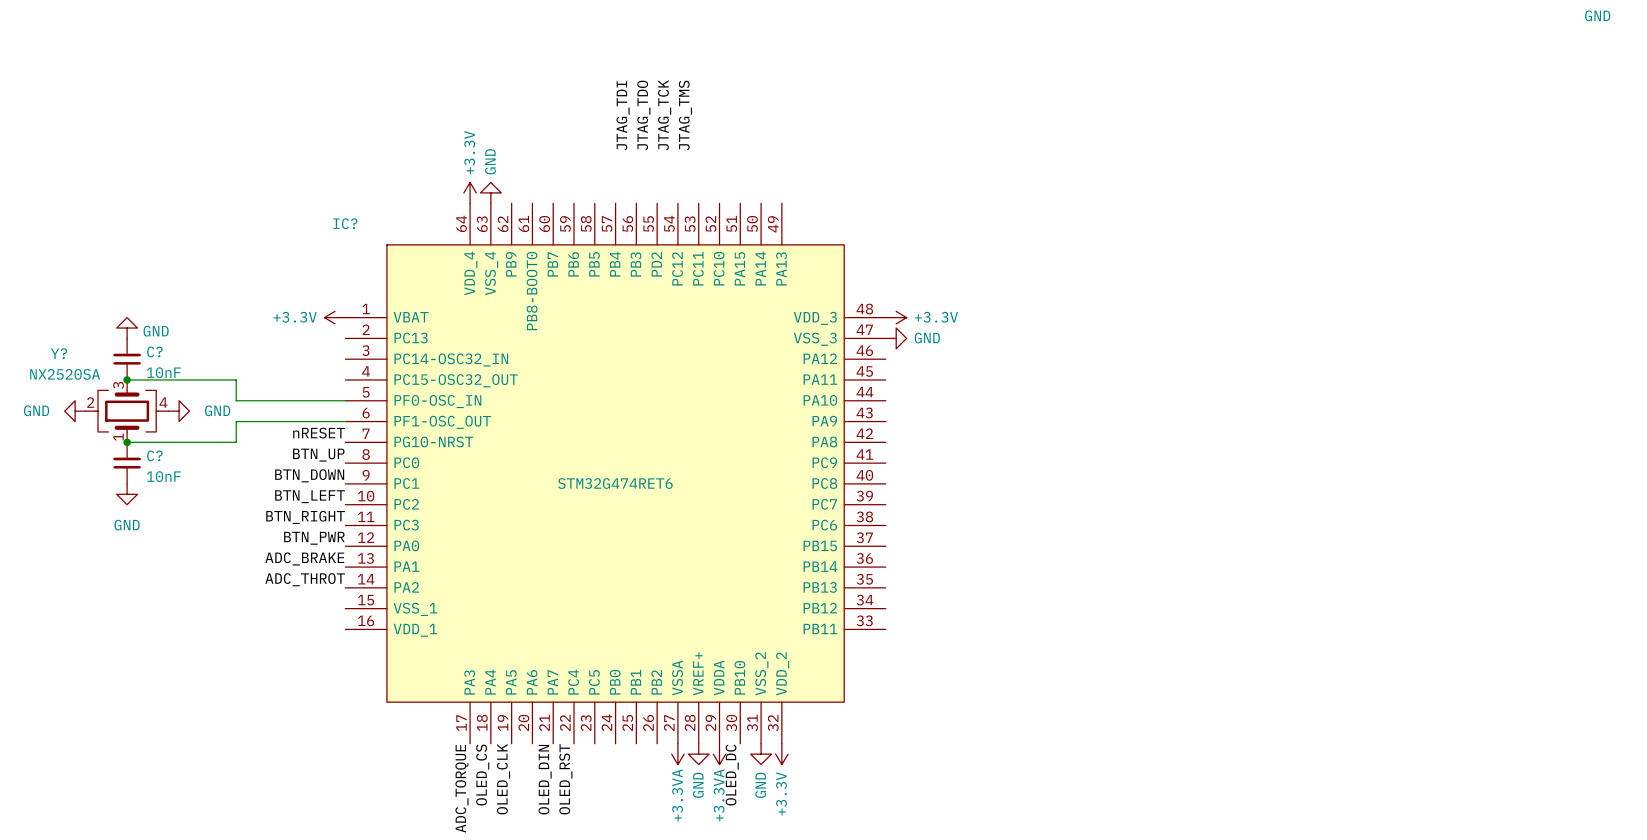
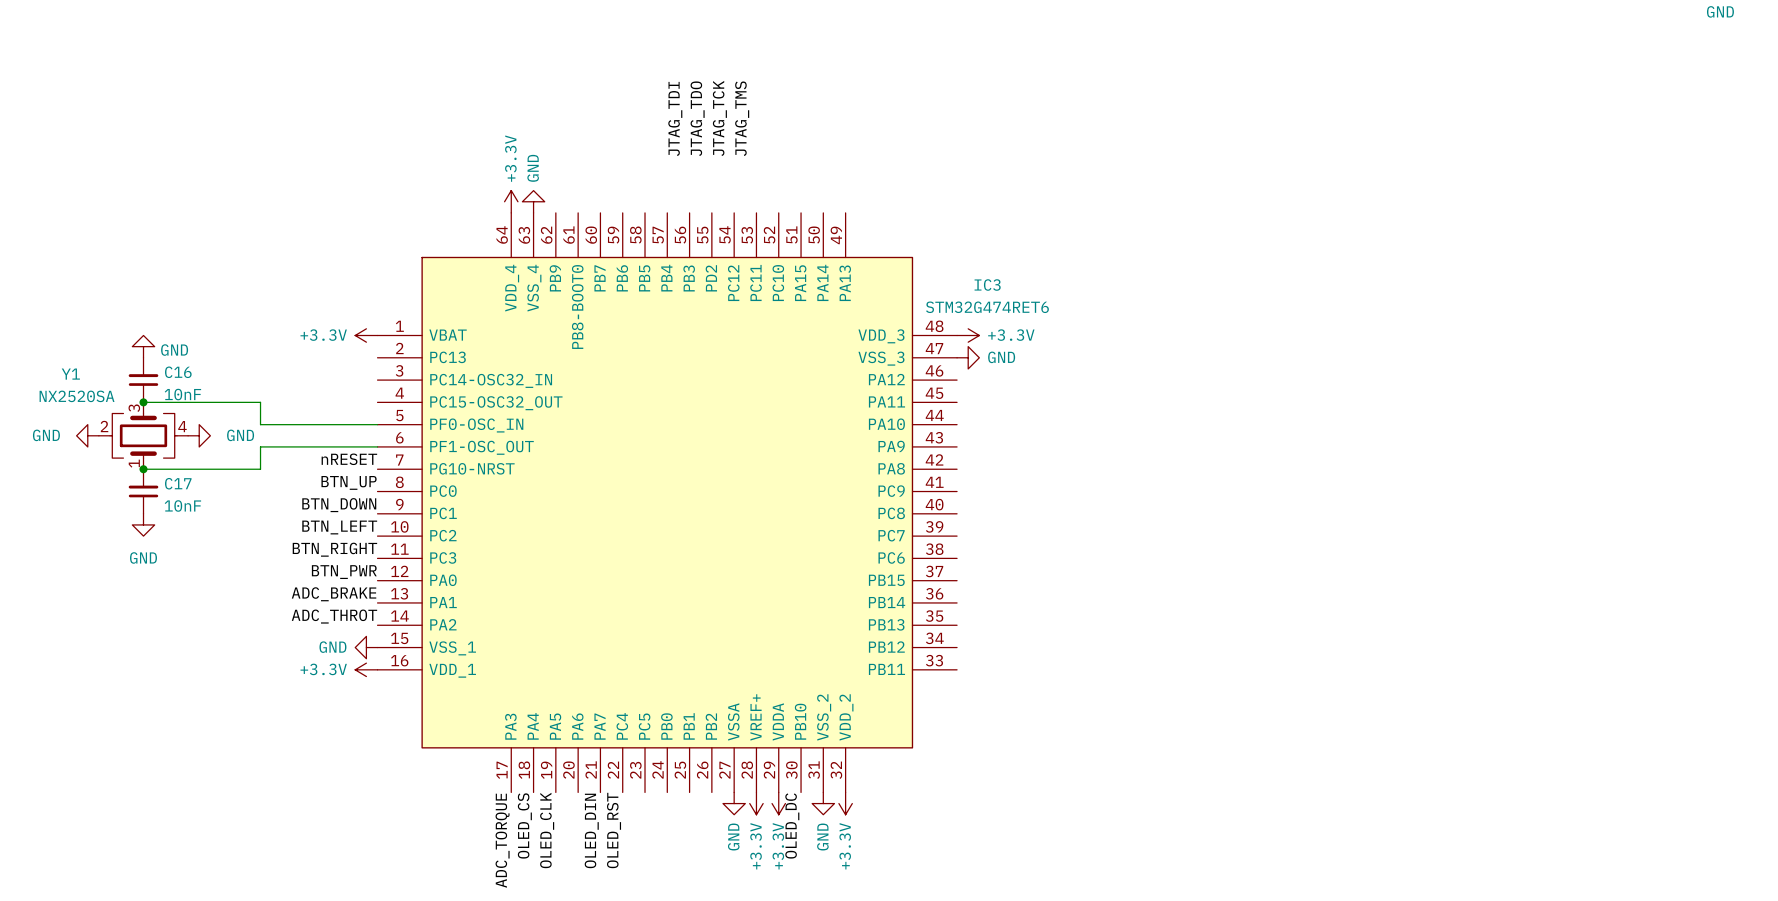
IC? name: IC? (345, 223) -> IC3 (987, 285)
C? name: C? (154, 351) -> C16 (178, 372)
Y? name: Y? (59, 353) -> Y1 (70, 374)
C? name: C? (154, 455) -> C17 (178, 483)
IC? value position: STM32G474RET6 (615, 483) -> STM32G474RET6 (987, 307)
power symbol: none -> GND (366, 647)
power symbol: none -> +3.3V (366, 669)
power symbol: +3.3VA (677, 754) -> GND (734, 803)
power symbol: GND (698, 754) -> +3.3V (756, 803)
power symbol: +3.3VA (719, 754) -> +3.3V (778, 803)

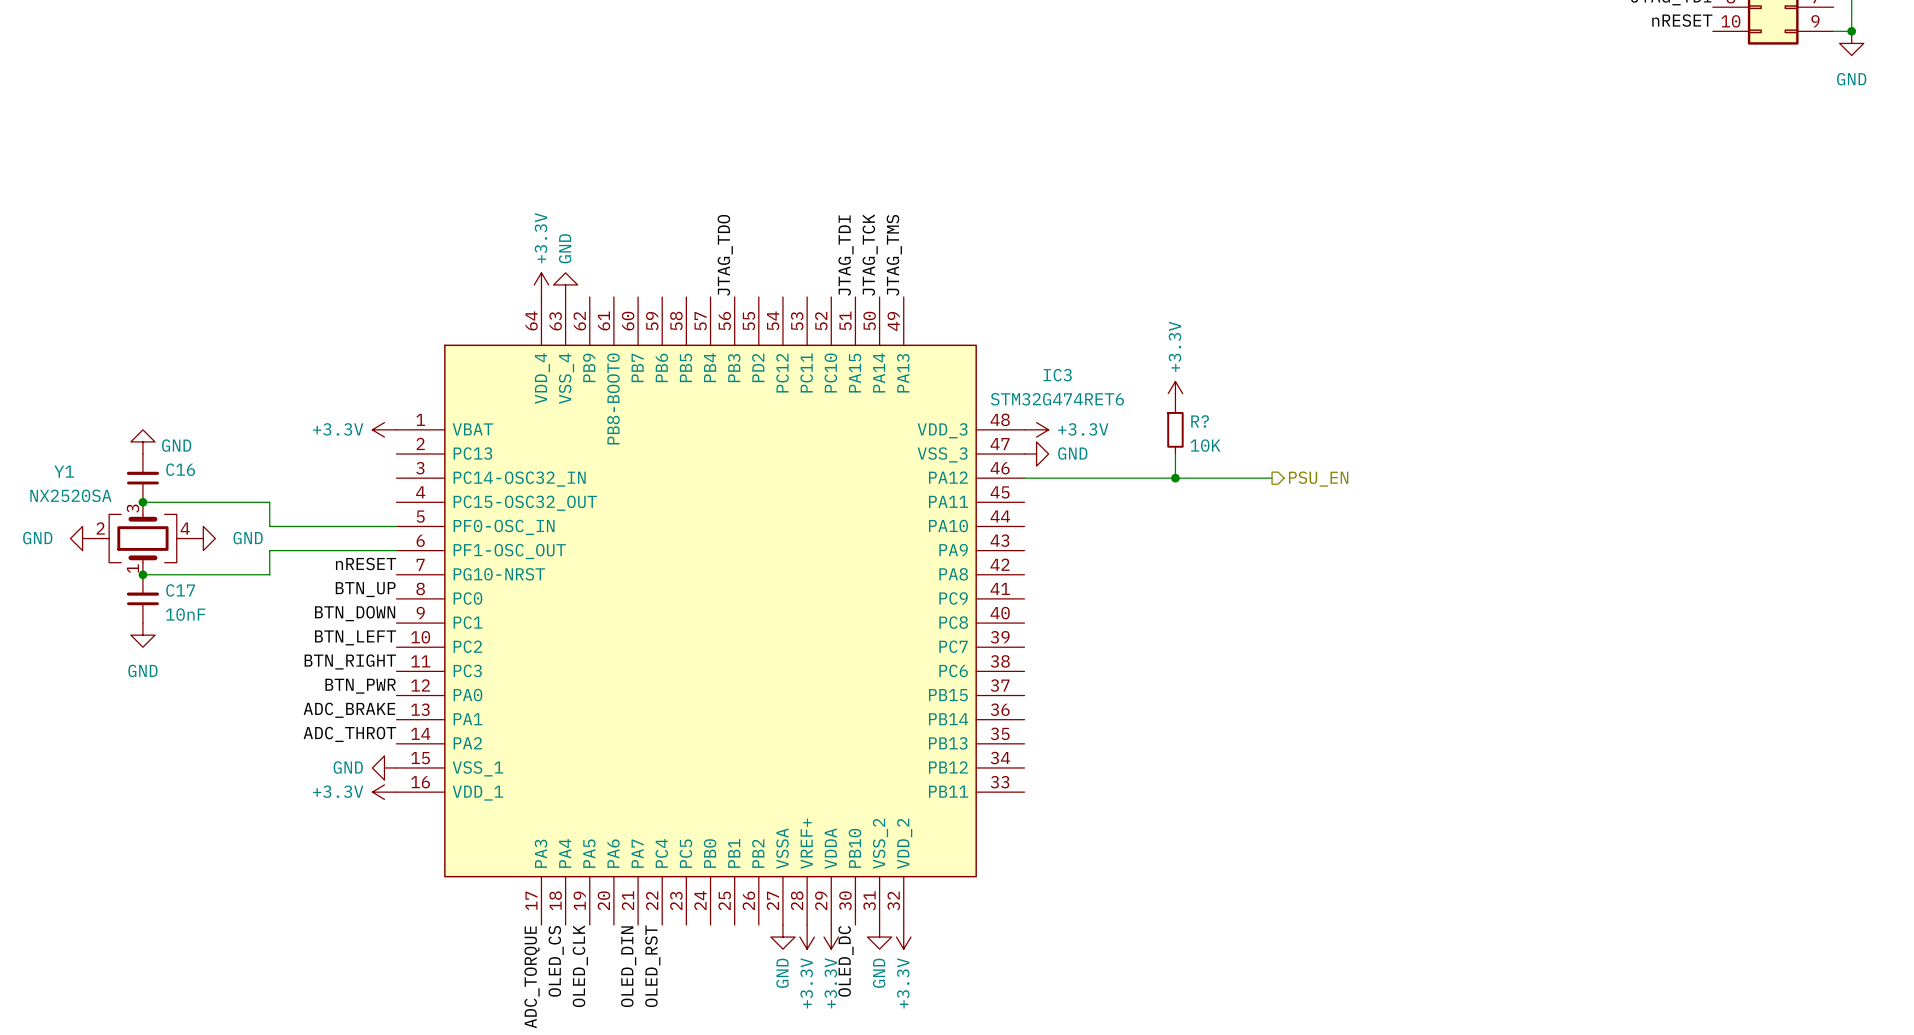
label position: JTAG_TDI (675, 118) -> JTAG_TDI (846, 255)
label position: JTAG_TDO (697, 118) -> JTAG_TDO (725, 255)
label position: JTAG_TCK (719, 118) -> JTAG_TCK (870, 255)
label position: JTAG_TMS (742, 118) -> JTAG_TMS (894, 255)
power symbol: none -> +3.3V (1175, 393)
R?: none -> 10K (1175, 429)
wire: none -> (1175, 454) (1175, 478)
wire: none -> (1024, 478) (1272, 478)
junction: none -> (1175, 478)
hierarchical label: none -> PSU_EN (1318, 479)
C16 value: 10nF (182, 394) -> none

